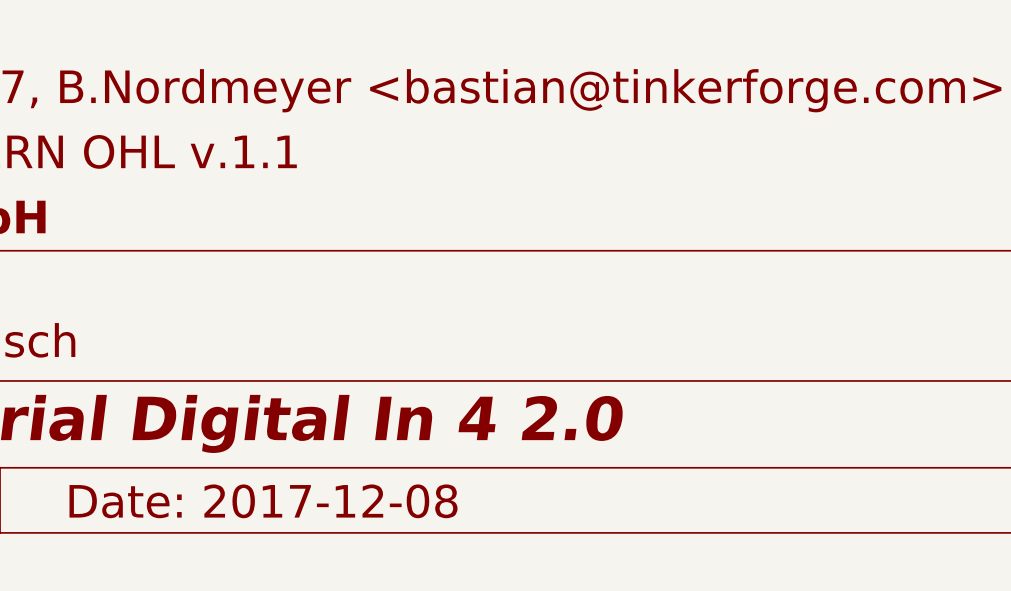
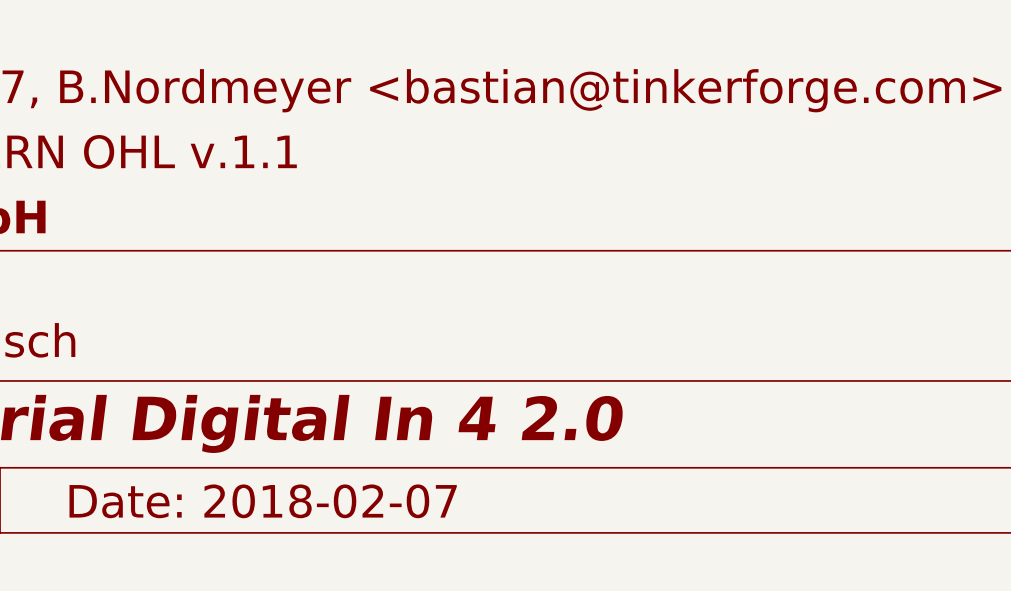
title block: Date: 2017-12-08 (263, 501) -> Date: 2018-02-07 (263, 501)

